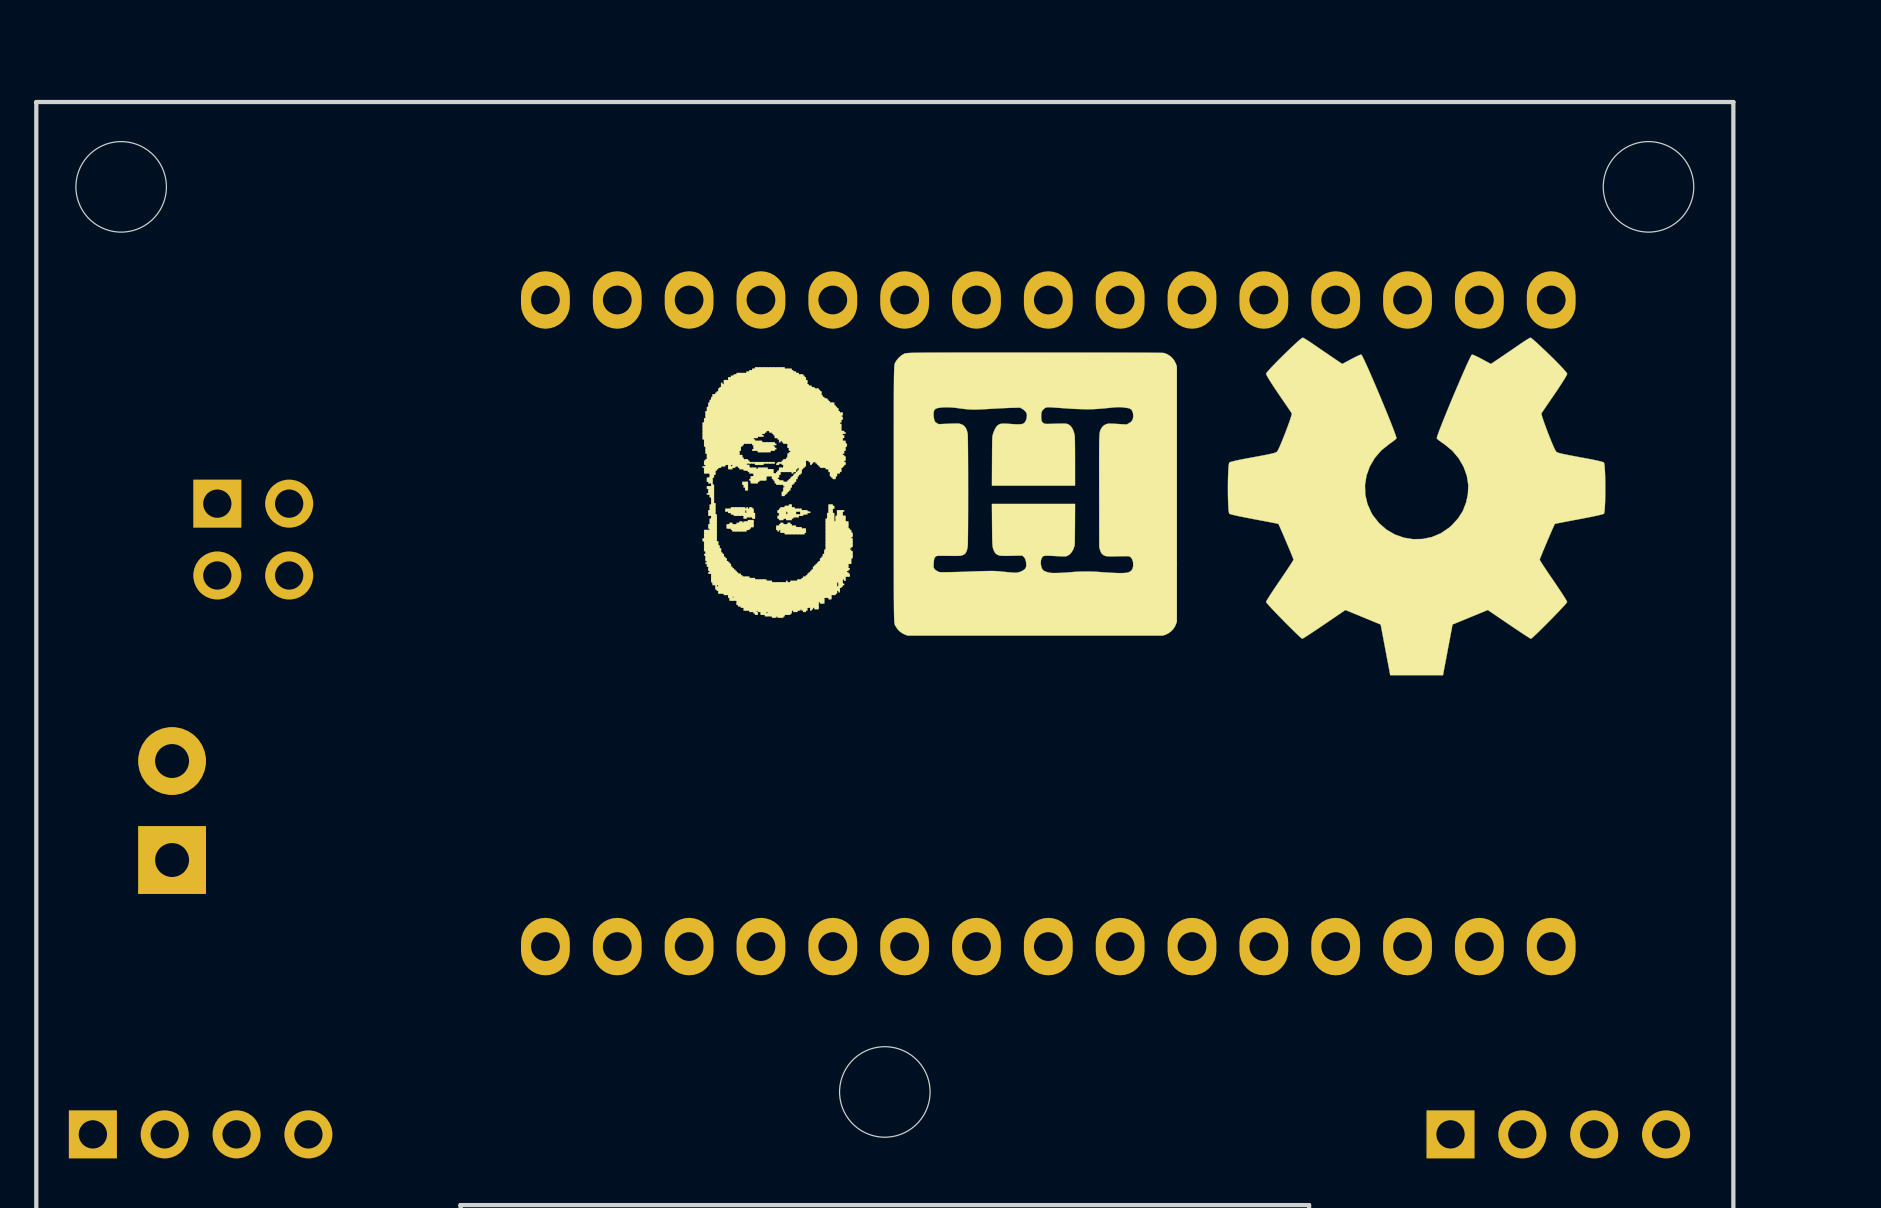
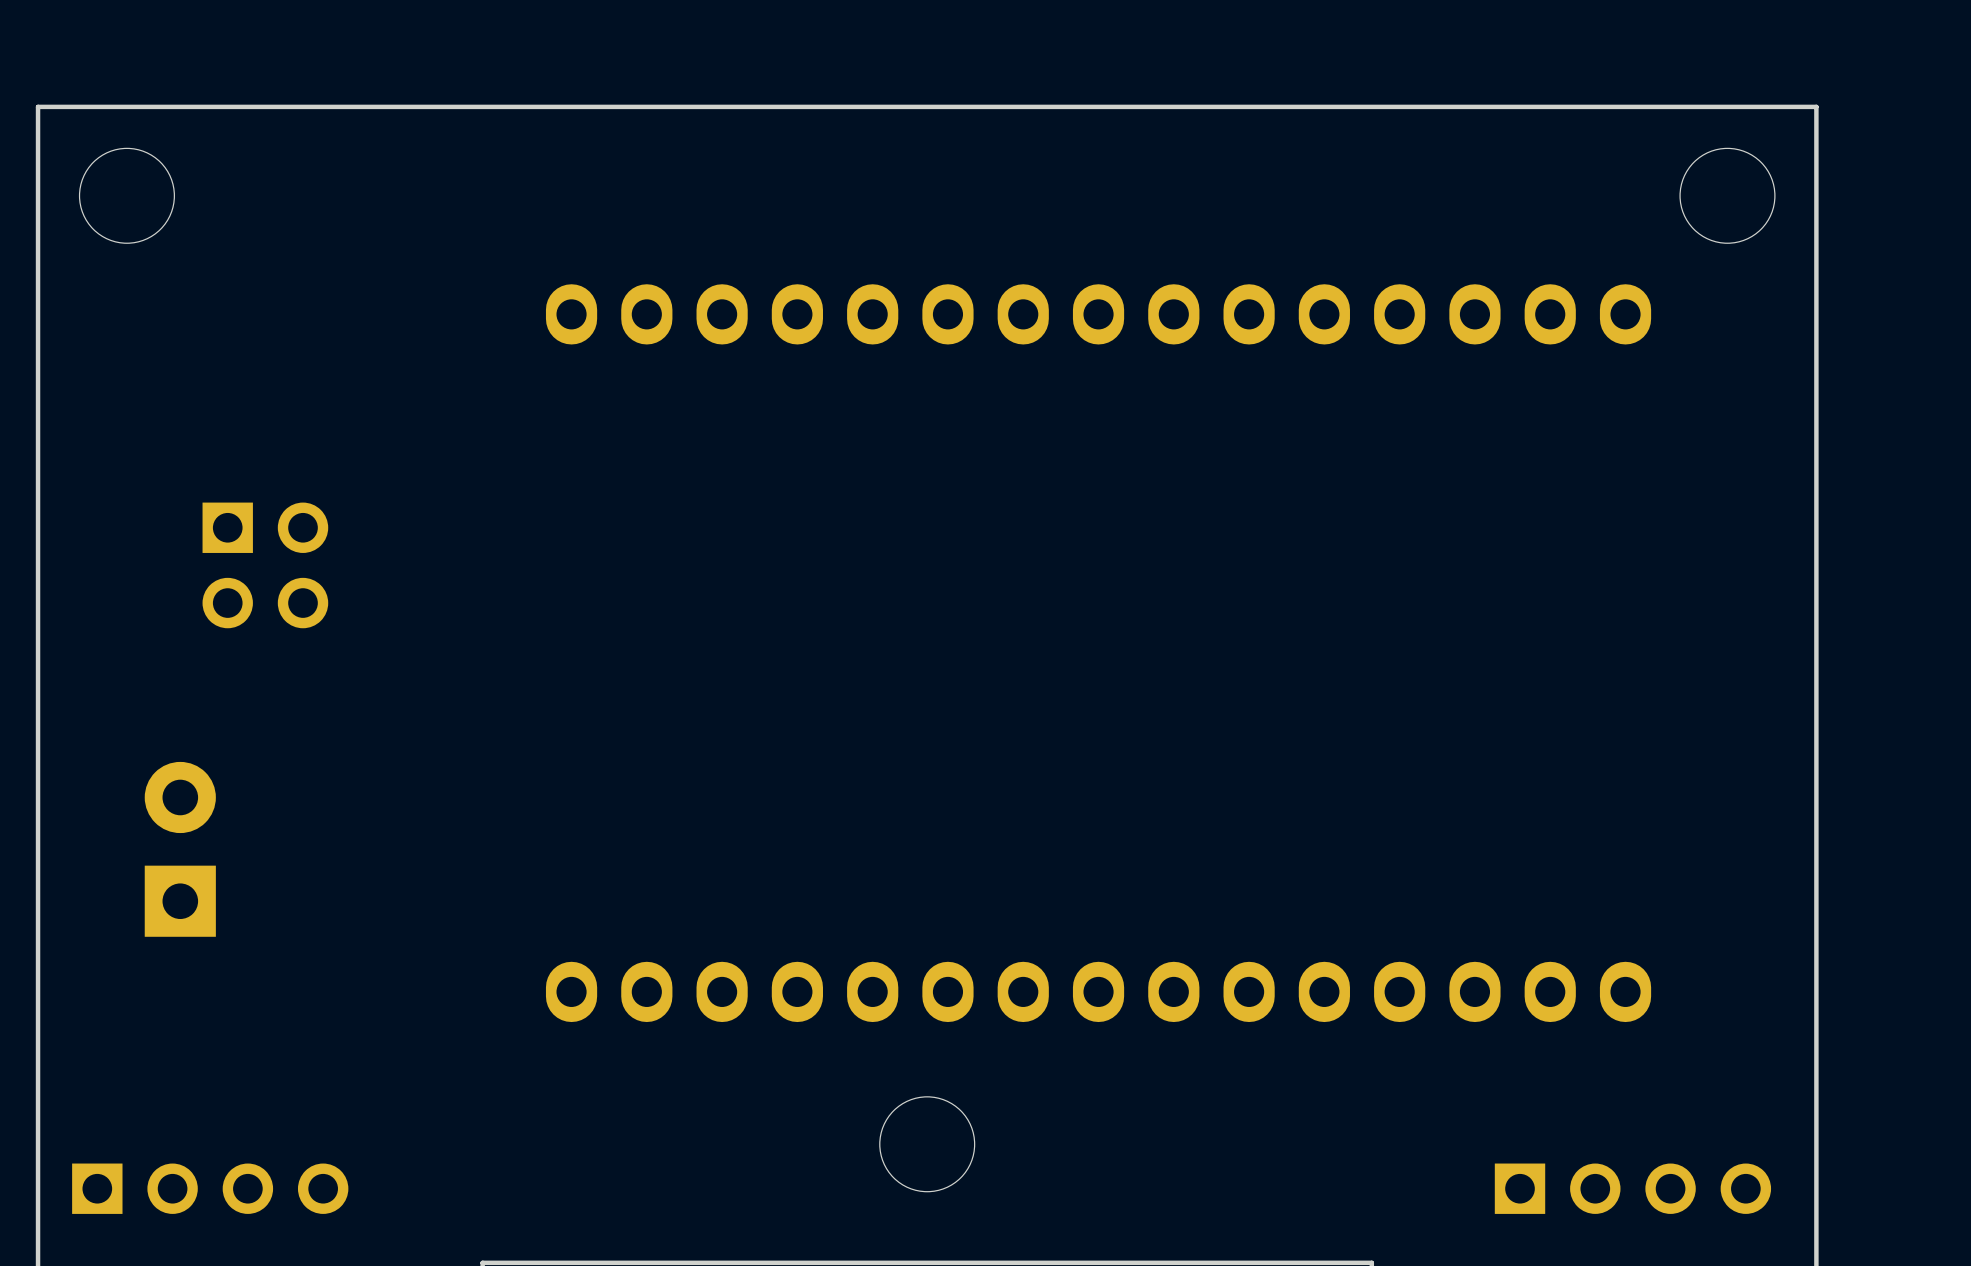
drawing: [1227, 337, 1606, 676] -> none
drawing: [893, 352, 1178, 636] -> none
drawing: [702, 367, 853, 618] -> none

